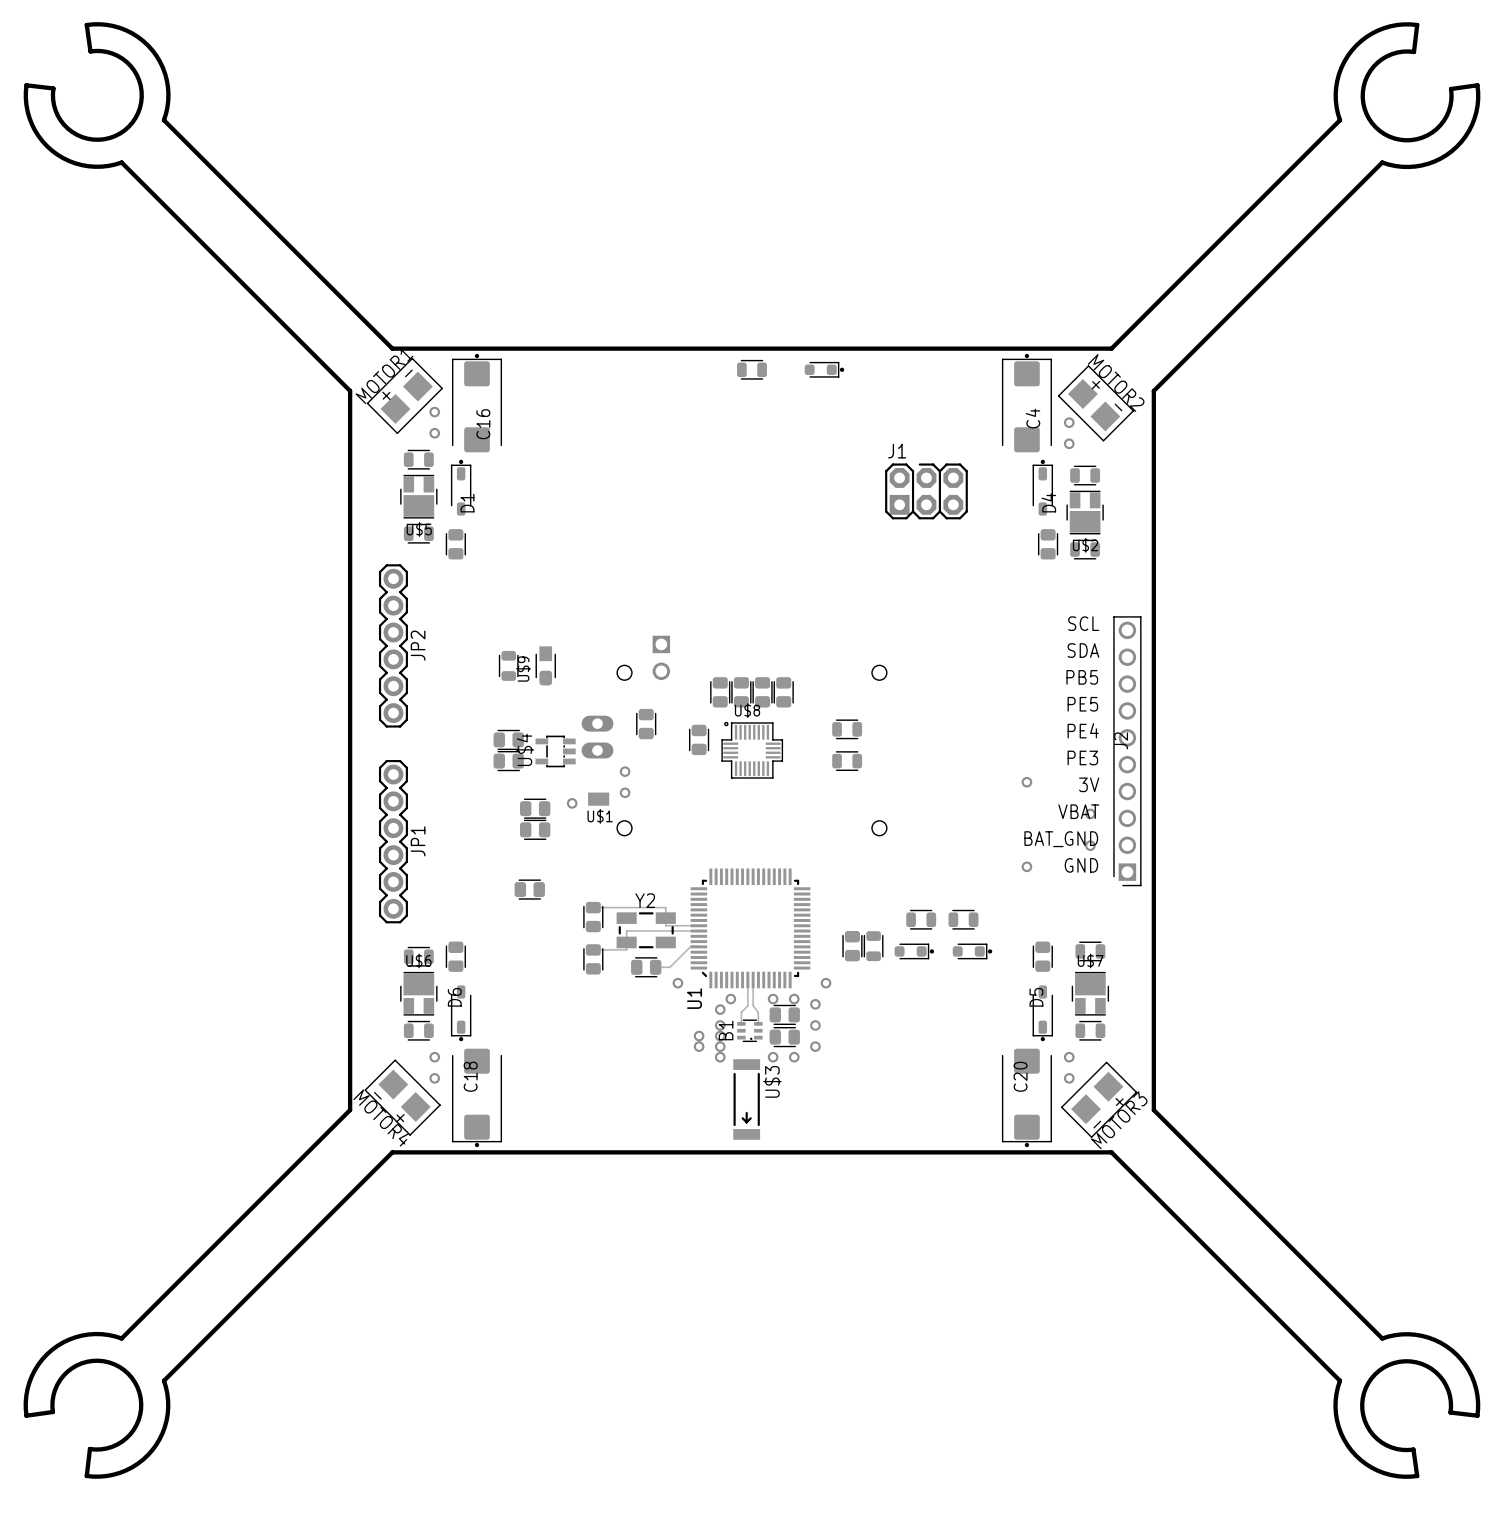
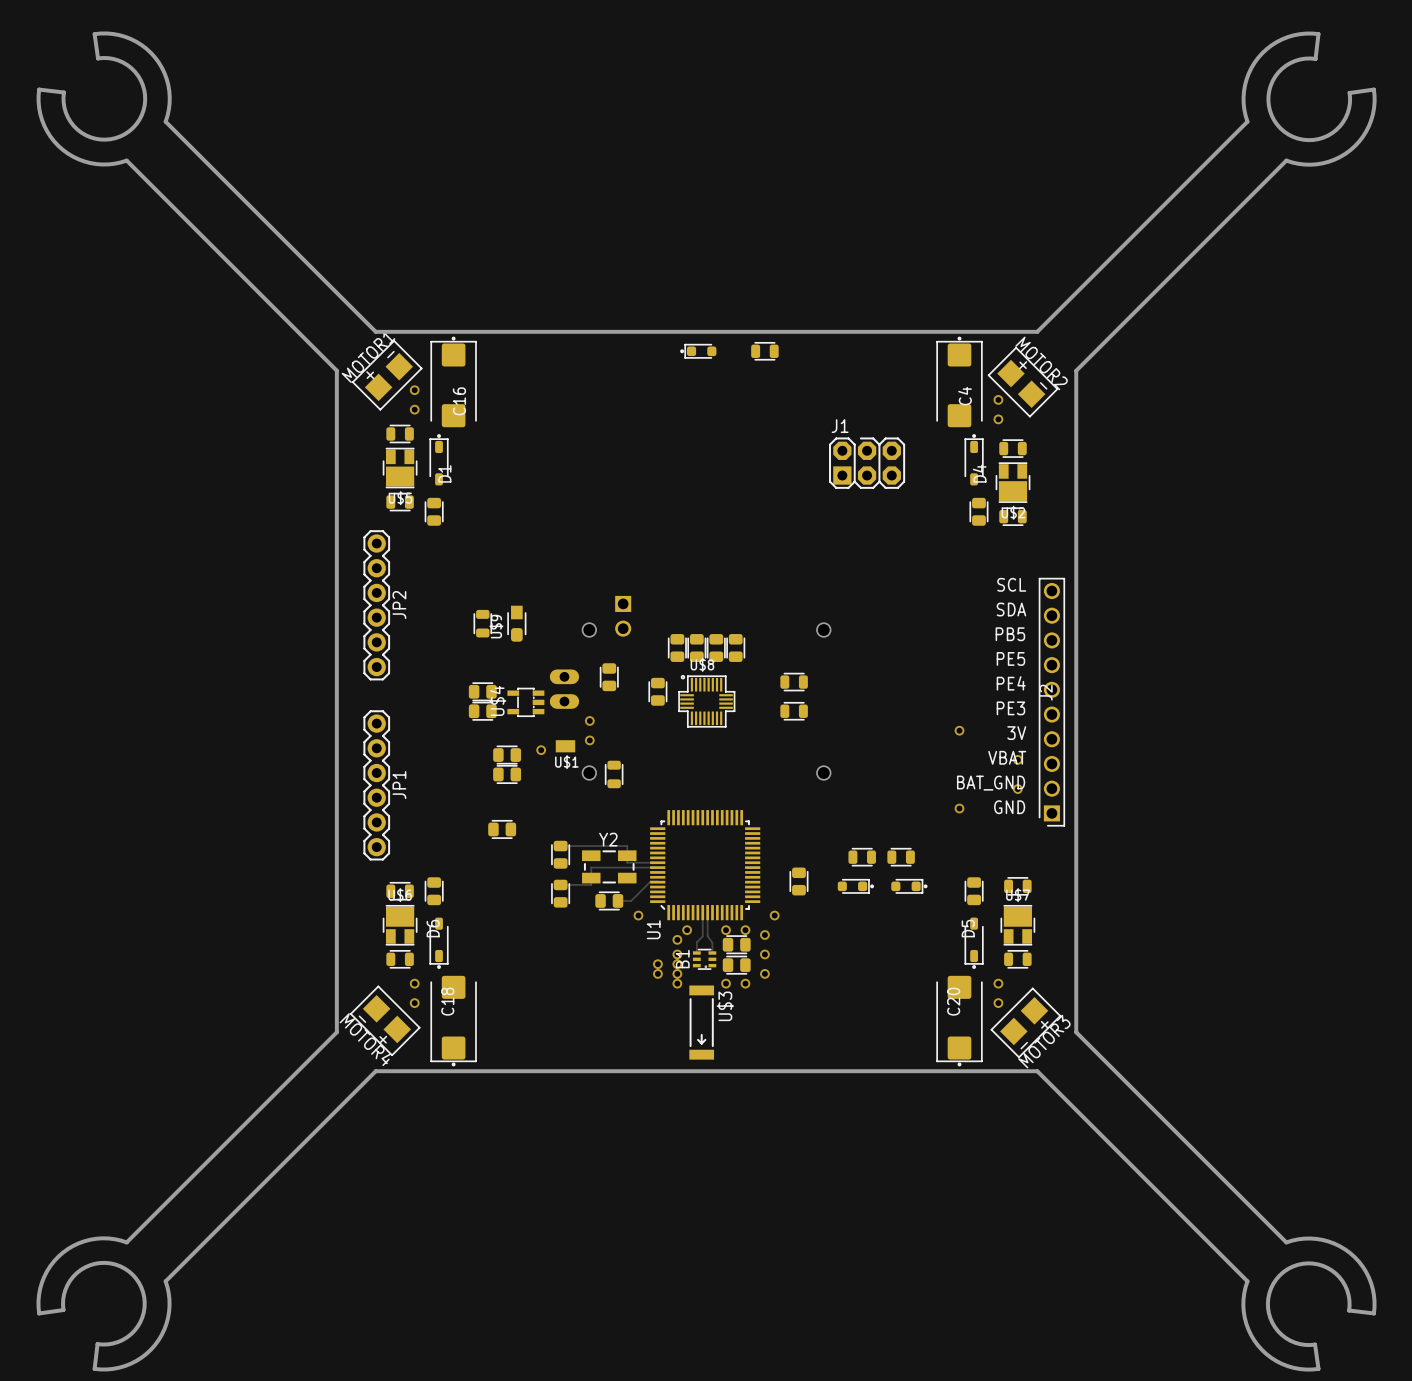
part footprint: [737, 359, 767, 380] -> [680, 344, 717, 359]
part footprint: [804, 361, 845, 378] -> [751, 342, 779, 361]
part position: (873, 946) -> (614, 774)

